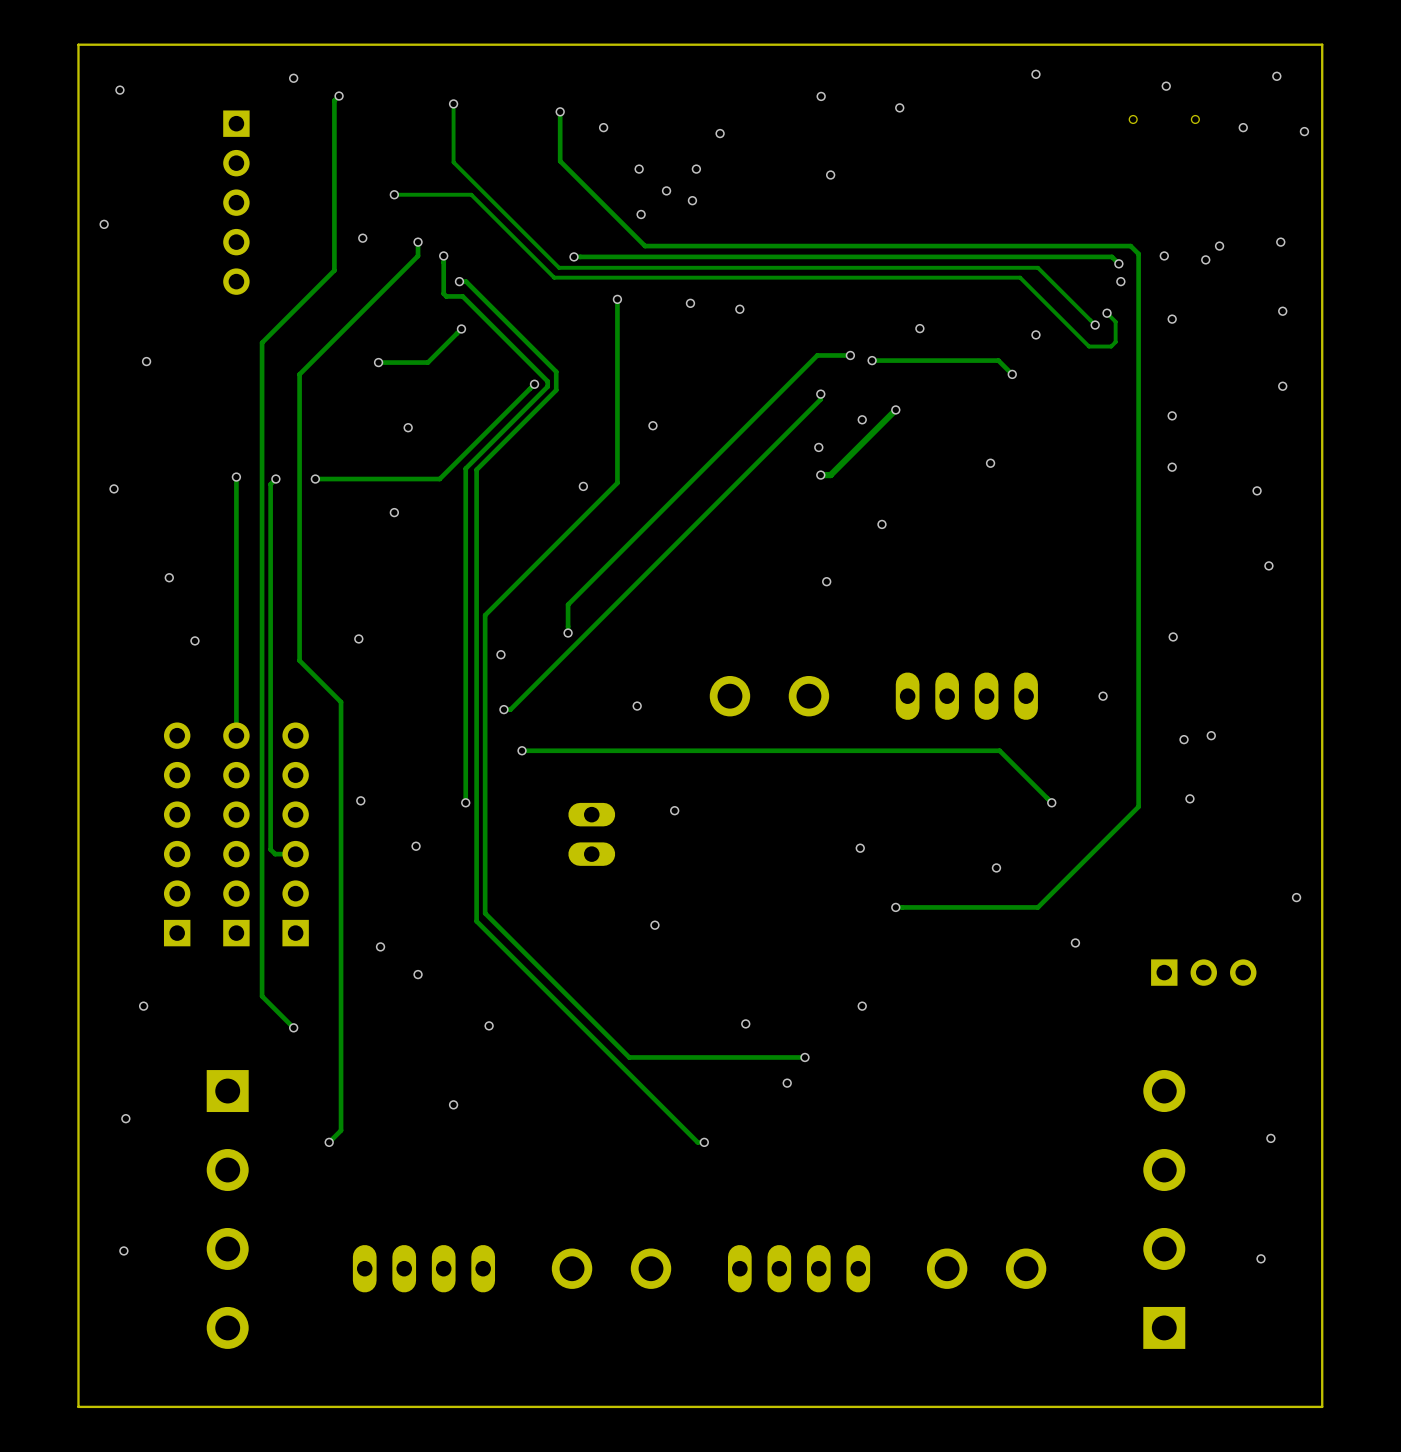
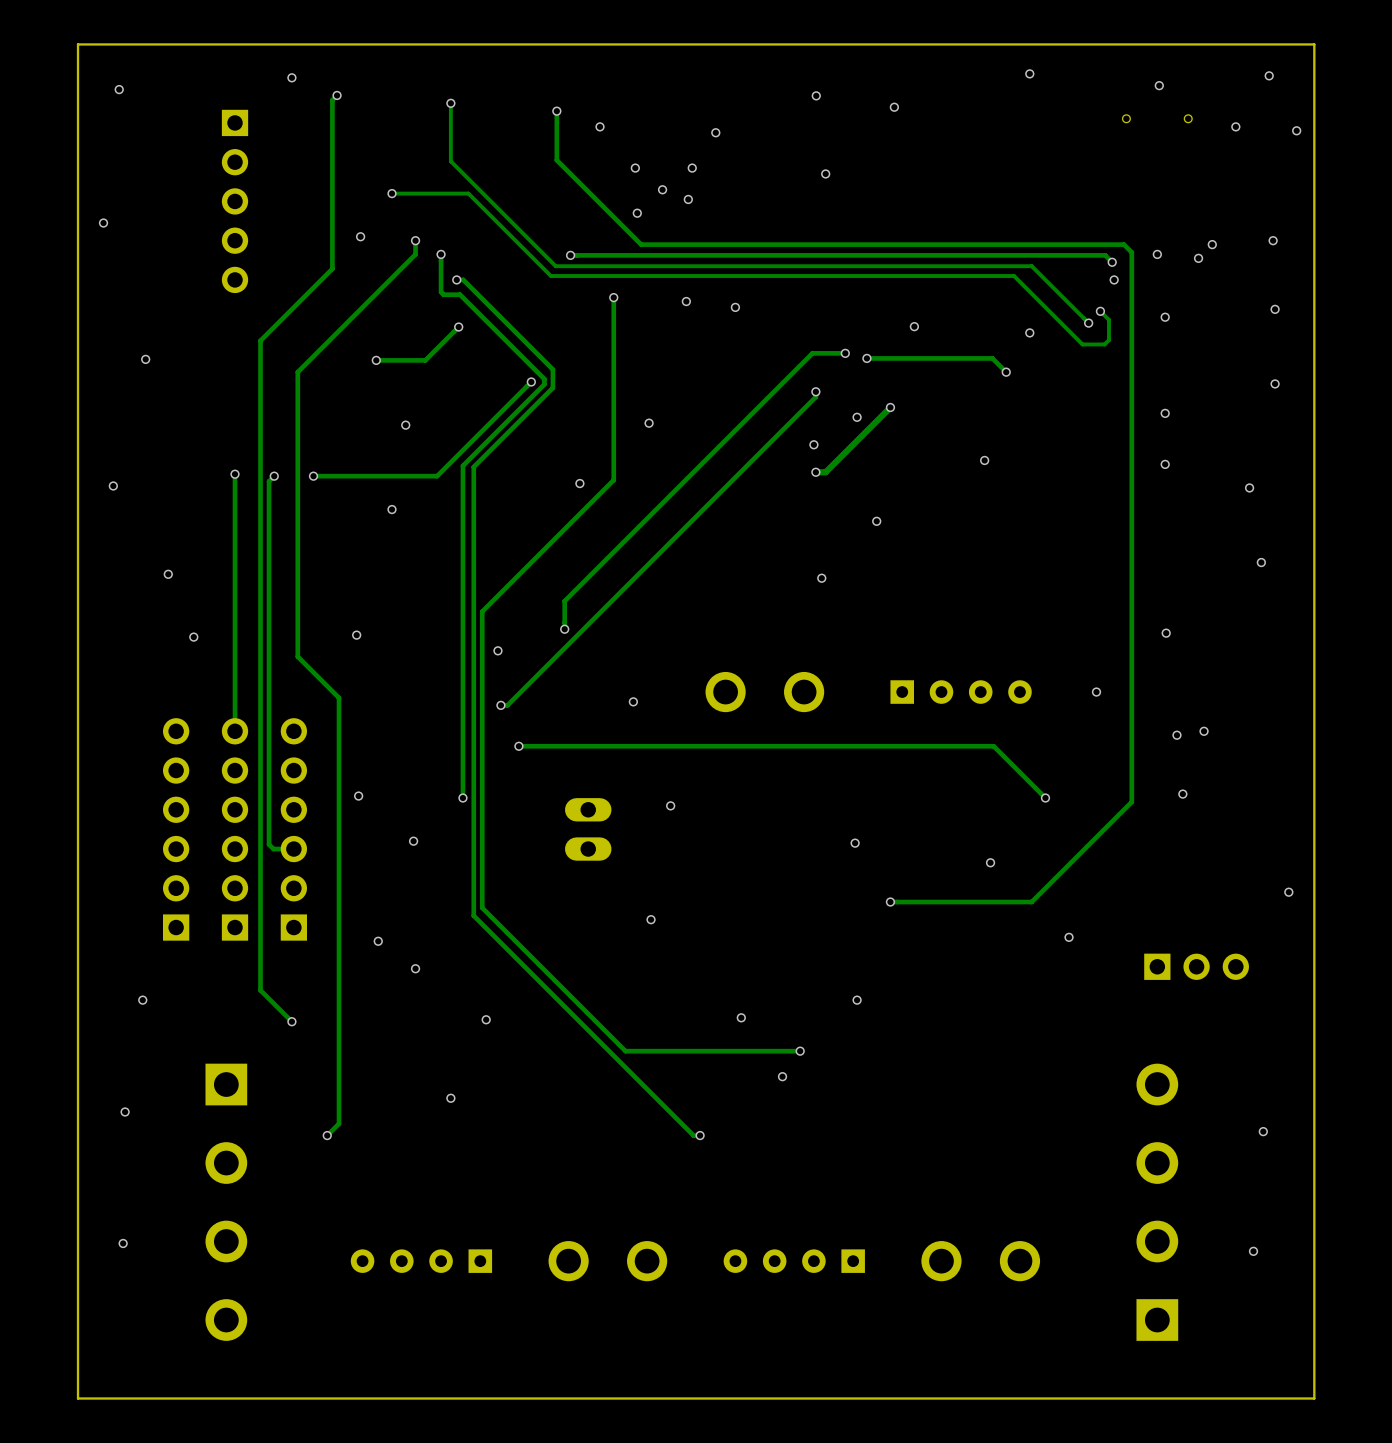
part footprint: [895, 672, 1038, 720] -> [890, 680, 1032, 704]
part footprint: [352, 1245, 496, 1293] -> [350, 1249, 493, 1273]
part footprint: [727, 1245, 871, 1293] -> [723, 1249, 865, 1273]

